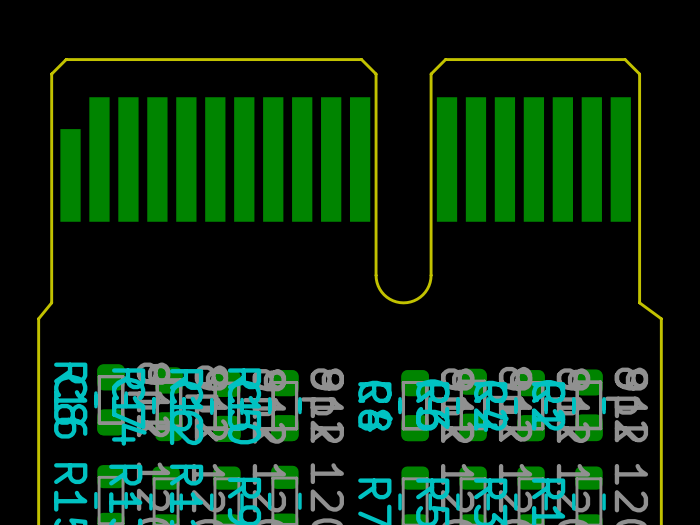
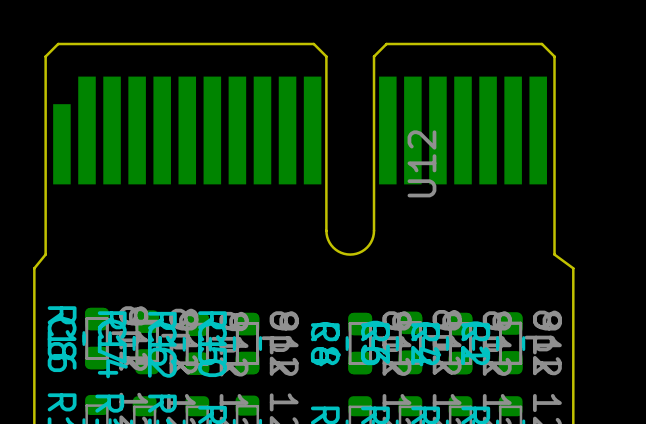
U12: none -> (421, 163)

